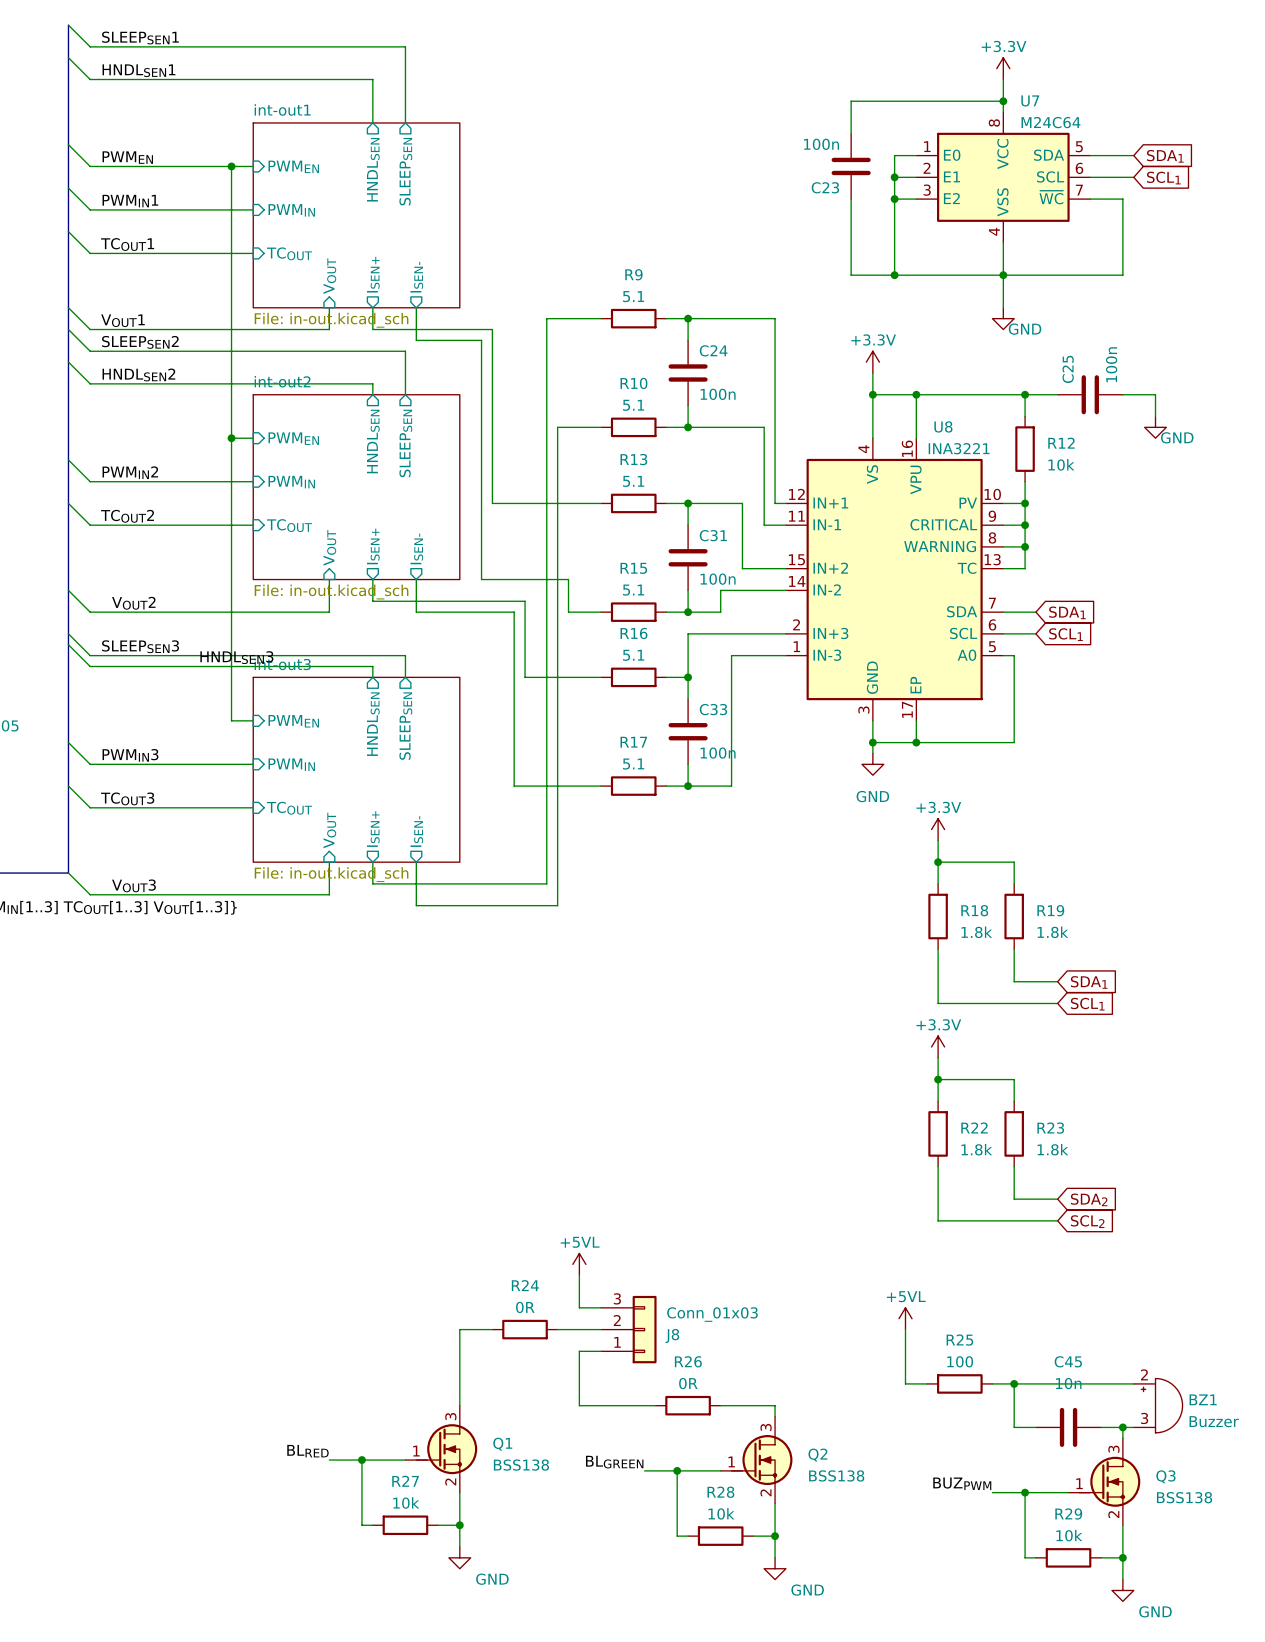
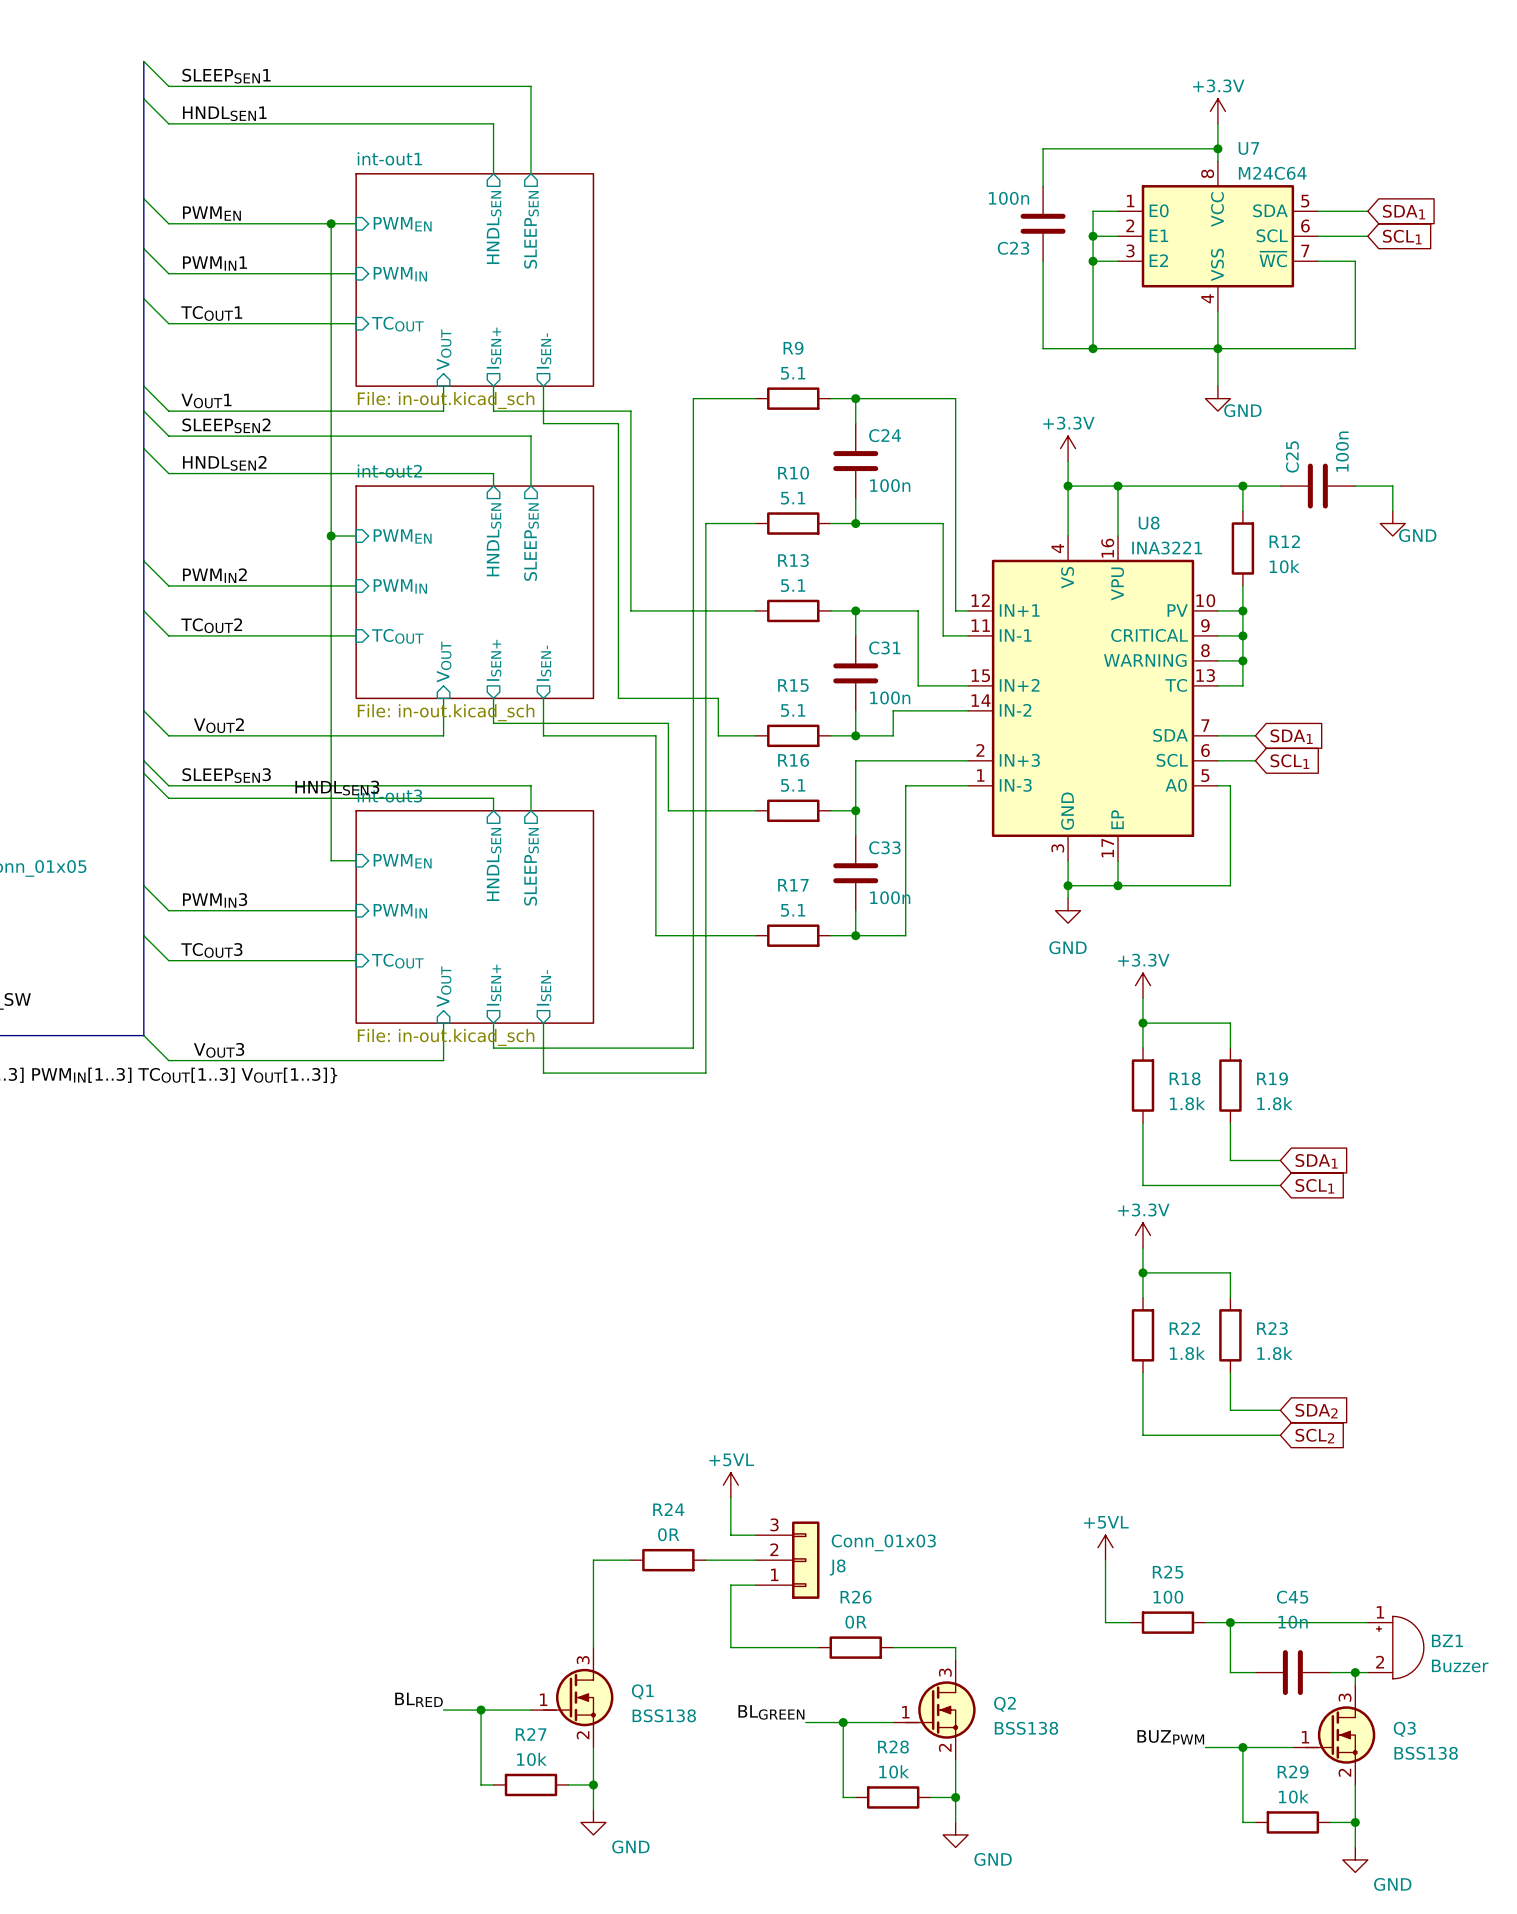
BZ1 pin number: 2 (1144, 1374) -> 1 (1380, 1612)
BZ1 pin number: 3 (1144, 1418) -> 2 (1380, 1662)

